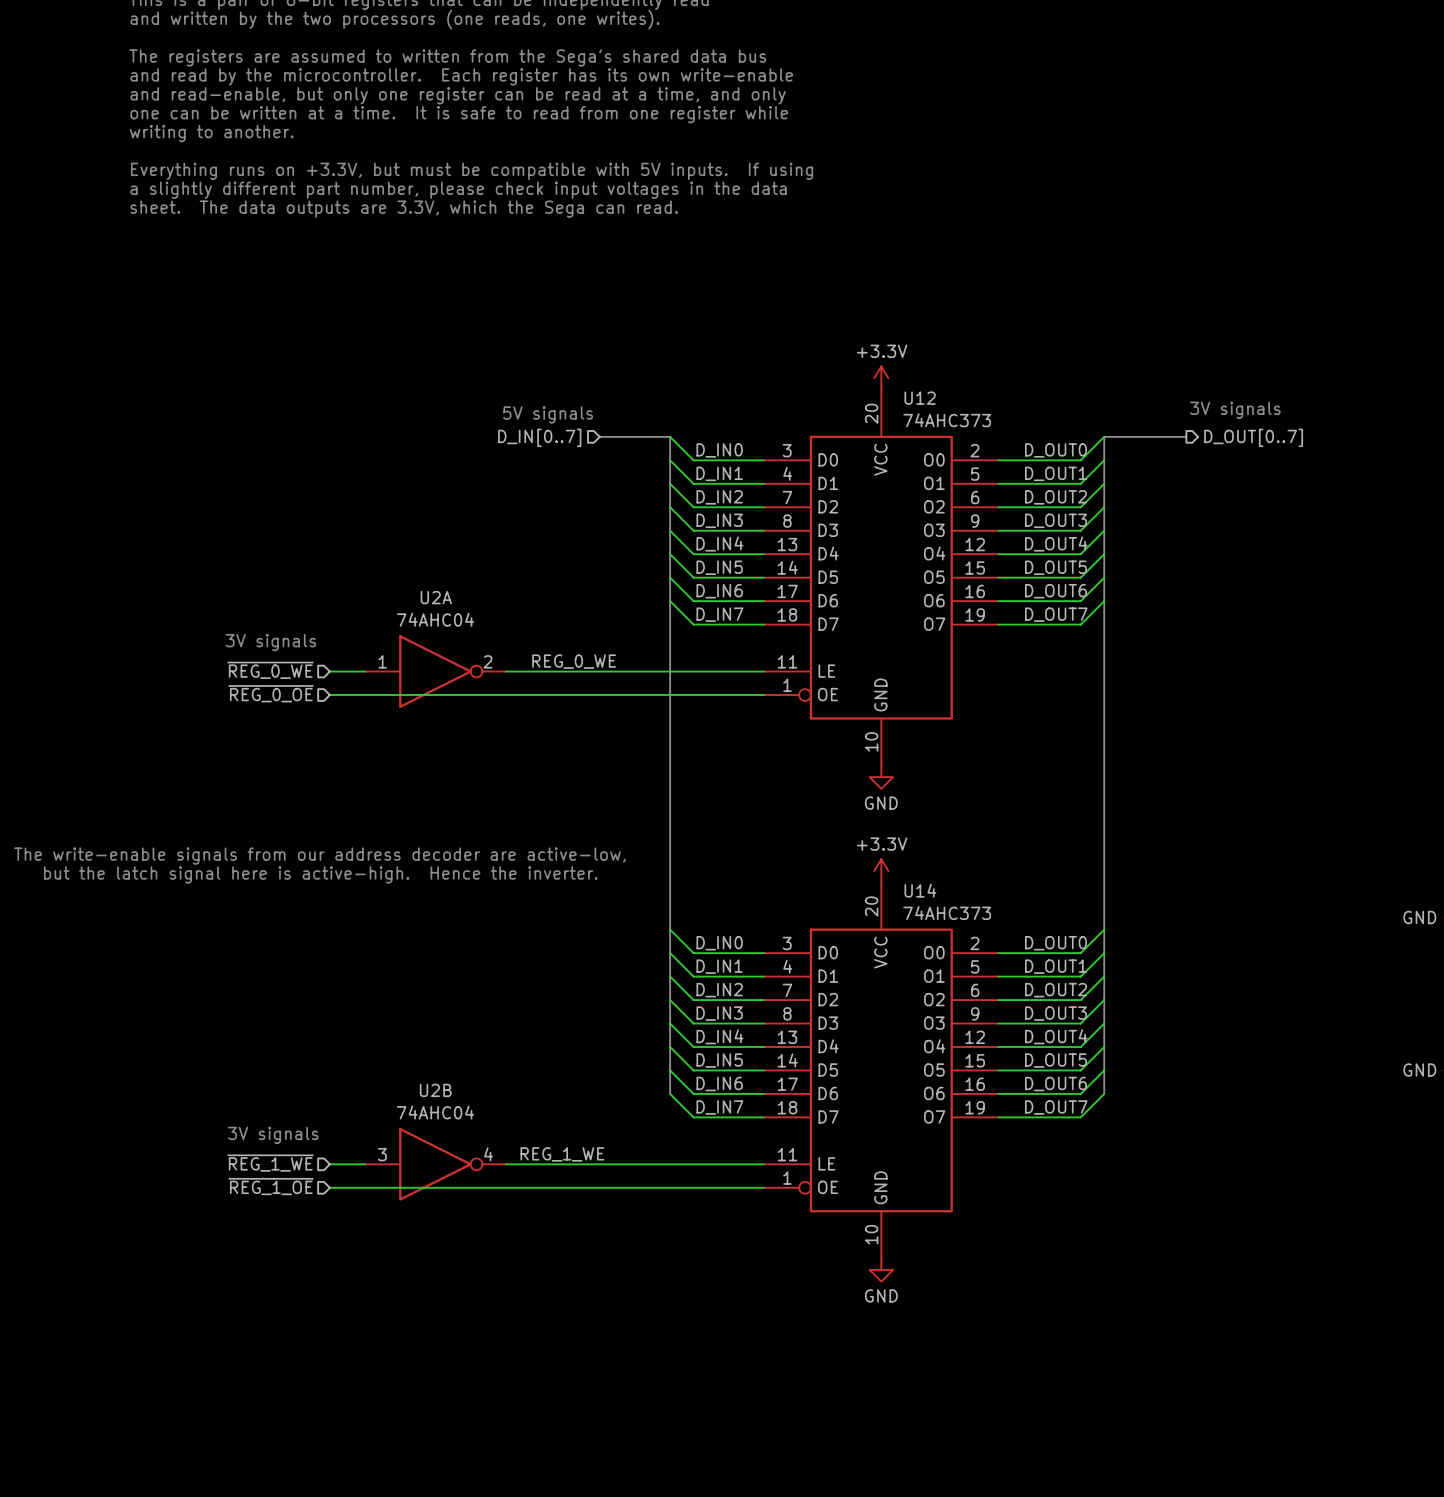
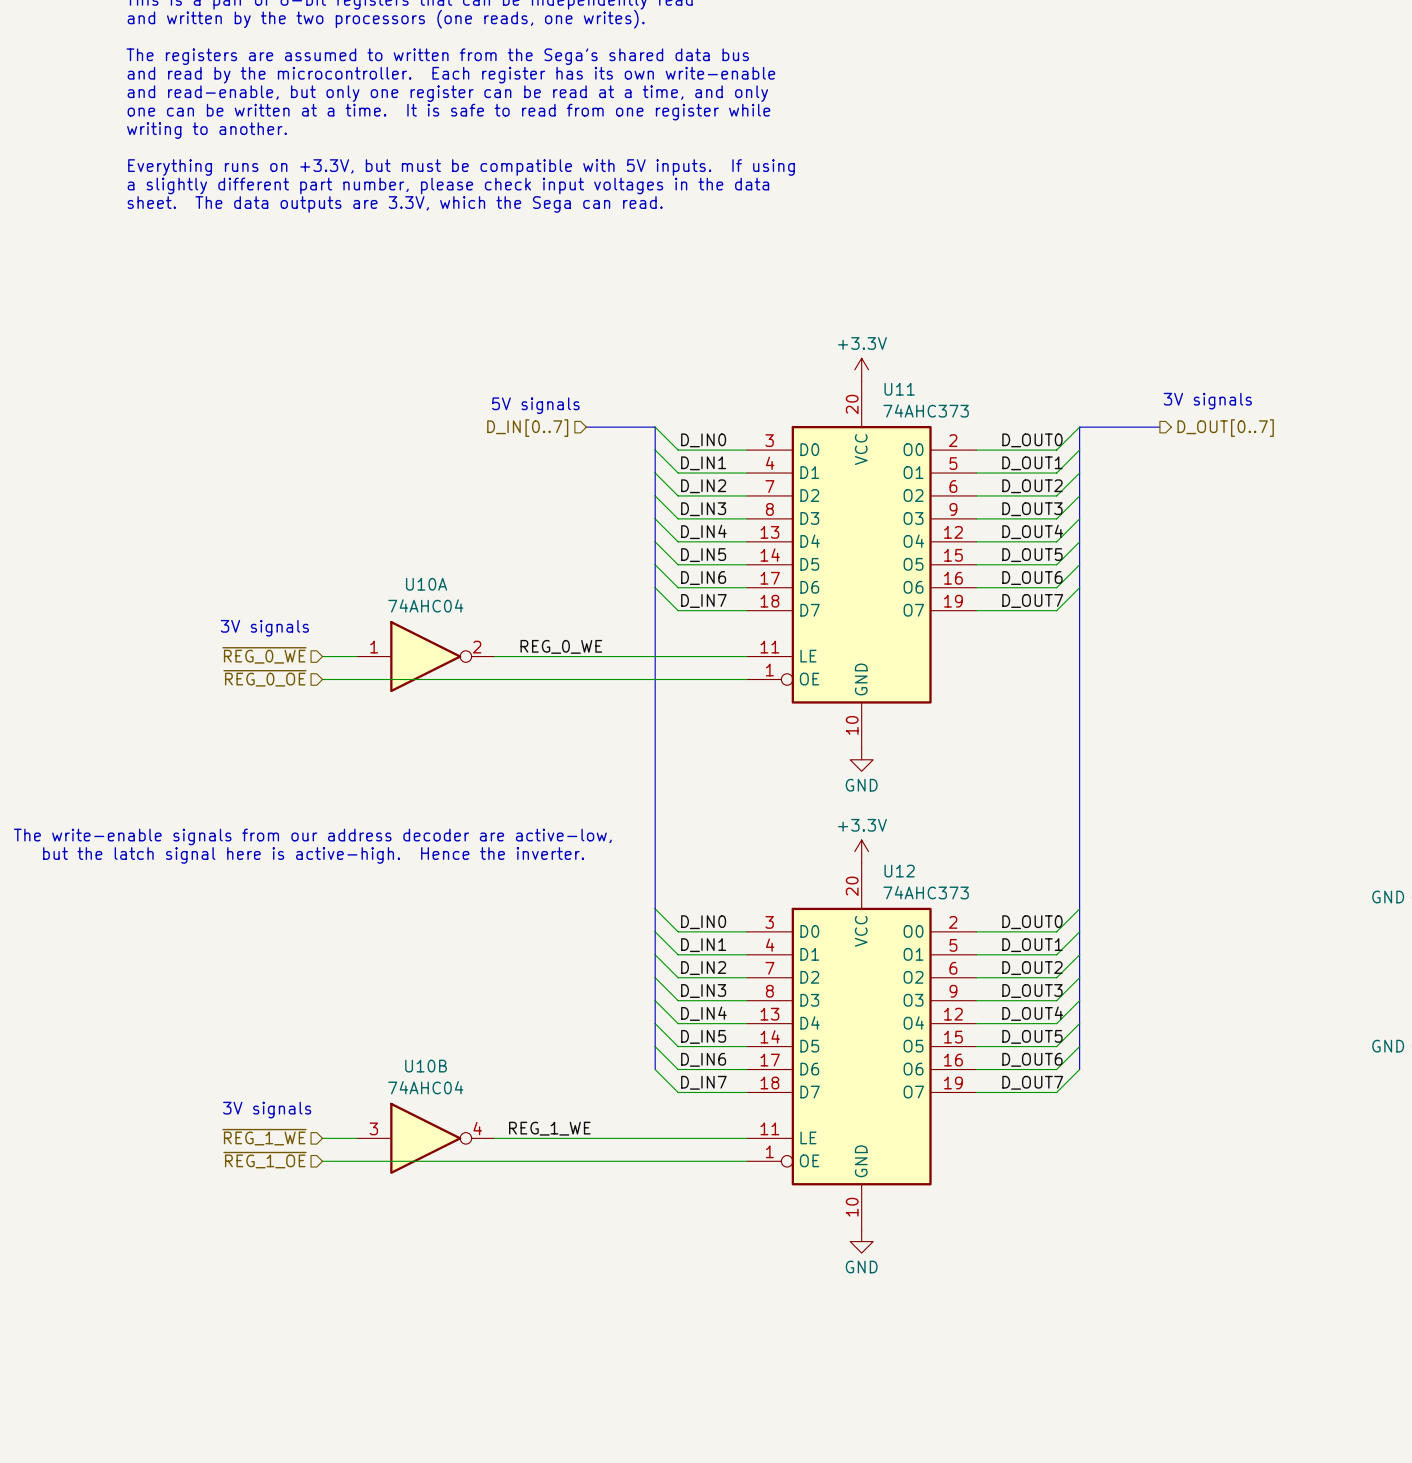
U12 name: U12 (920, 398) -> U11 (899, 389)
U2A name: U2A (436, 597) -> U10A (426, 584)
U14 name: U14 (920, 890) -> U12 (899, 871)
U2B name: U2B (435, 1090) -> U10B (426, 1066)

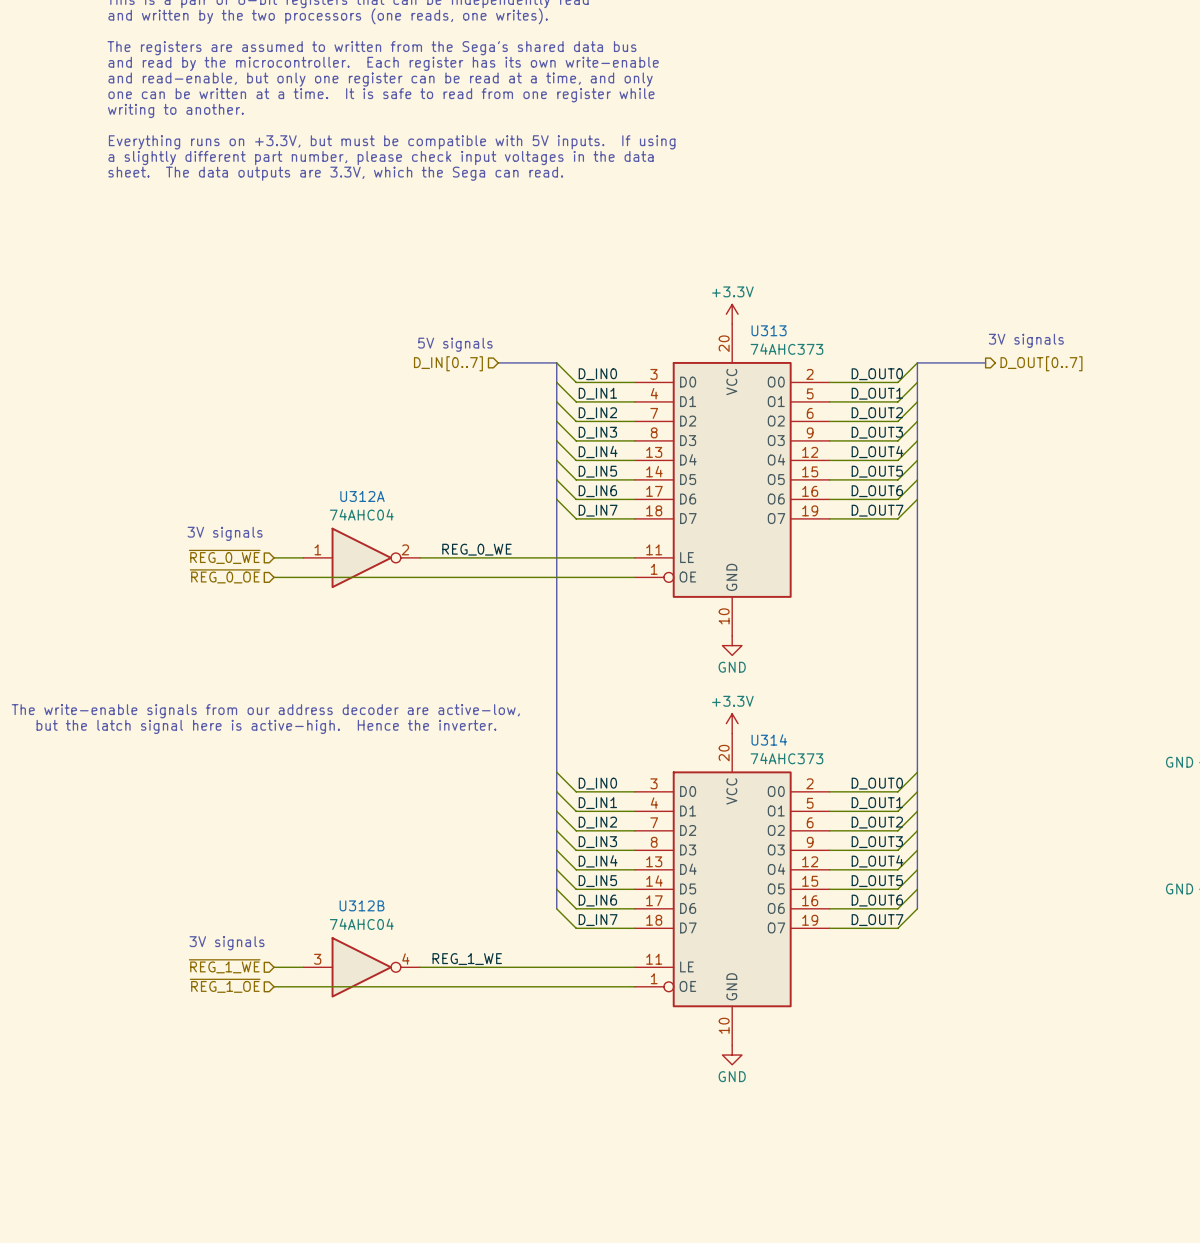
U11 name: U11 (899, 389) -> U313 (769, 330)
U10A name: U10A (426, 584) -> U312A (362, 496)
U12 name: U12 (899, 871) -> U314 (769, 739)
U10B name: U10B (426, 1066) -> U312B (362, 905)

